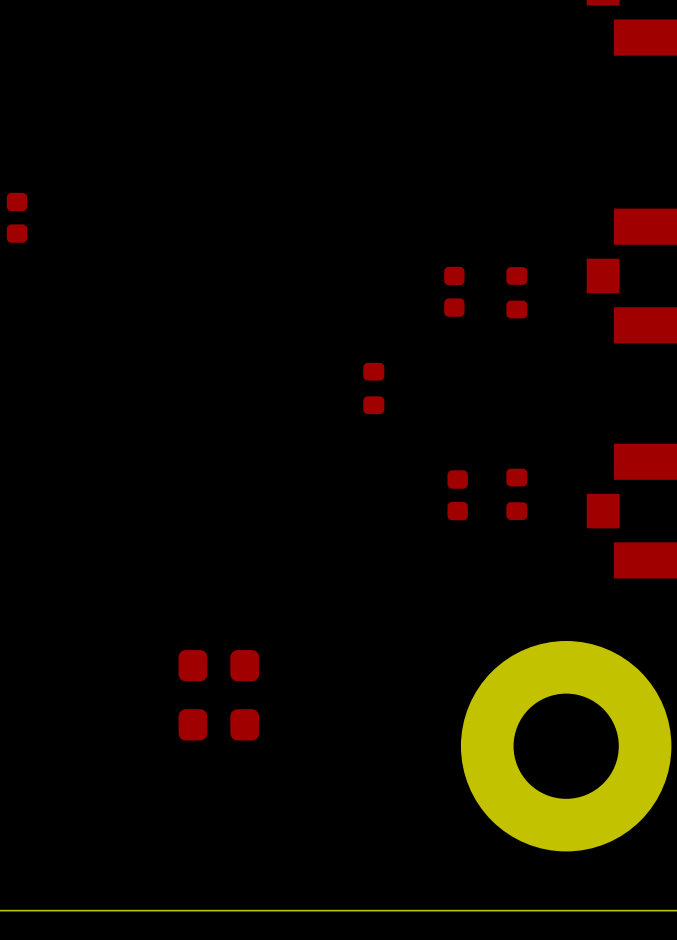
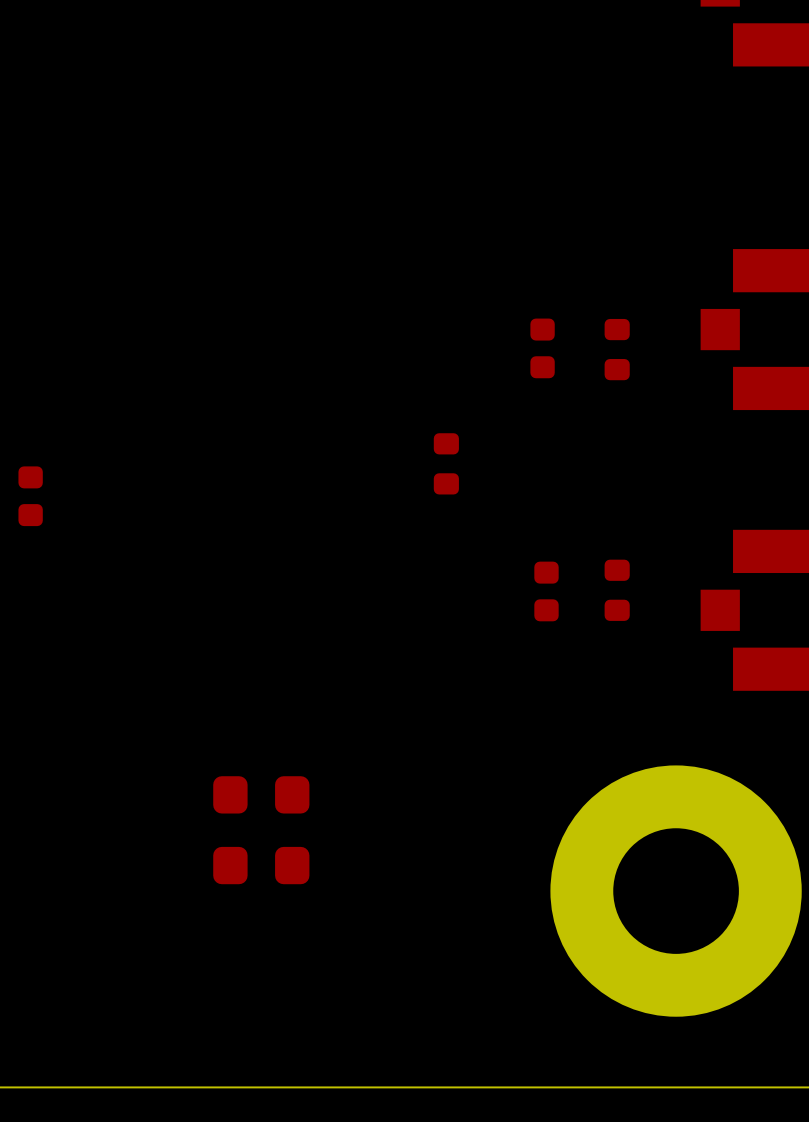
part position: (17, 217) -> (30, 496)

